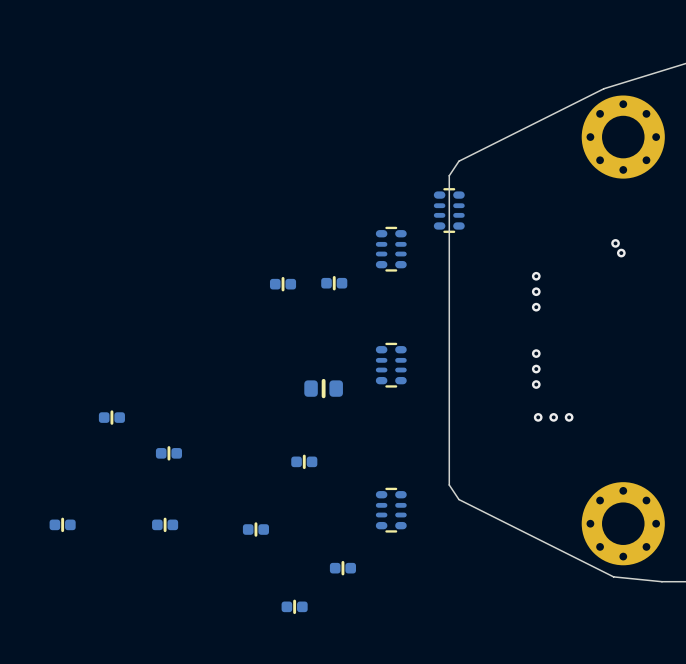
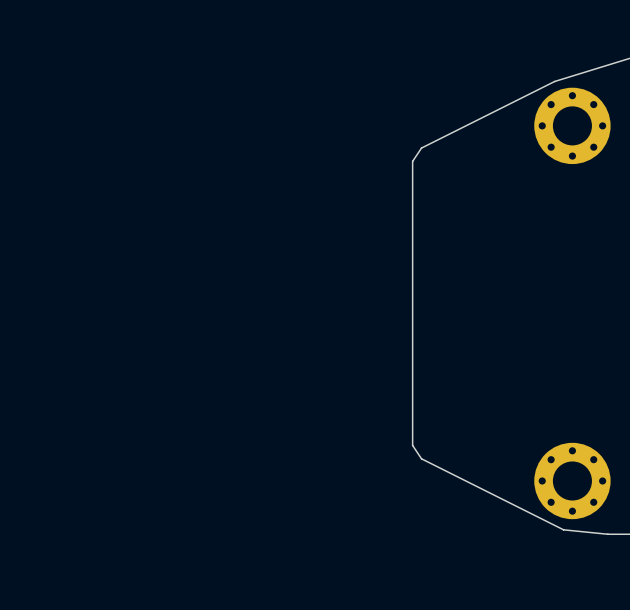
part: (449, 210) -> none
via: (615, 243) -> none
part: (391, 249) -> none
via: (621, 253) -> none
via: (536, 276) -> none
part: (334, 283) -> none
part: (283, 284) -> none
via: (536, 291) -> none
via: (536, 307) -> none
via: (536, 353) -> none
part: (391, 365) -> none
via: (536, 369) -> none
via: (536, 384) -> none
part: (323, 388) -> none
part: (111, 417) -> none
via: (538, 417) -> none
via: (553, 417) -> none
via: (569, 417) -> none
part: (168, 453) -> none
part: (304, 461) -> none
part: (391, 510) -> none
part: (62, 524) -> none
part: (165, 524) -> none
part: (255, 529) -> none
part: (342, 568) -> none
part: (294, 606) -> none

